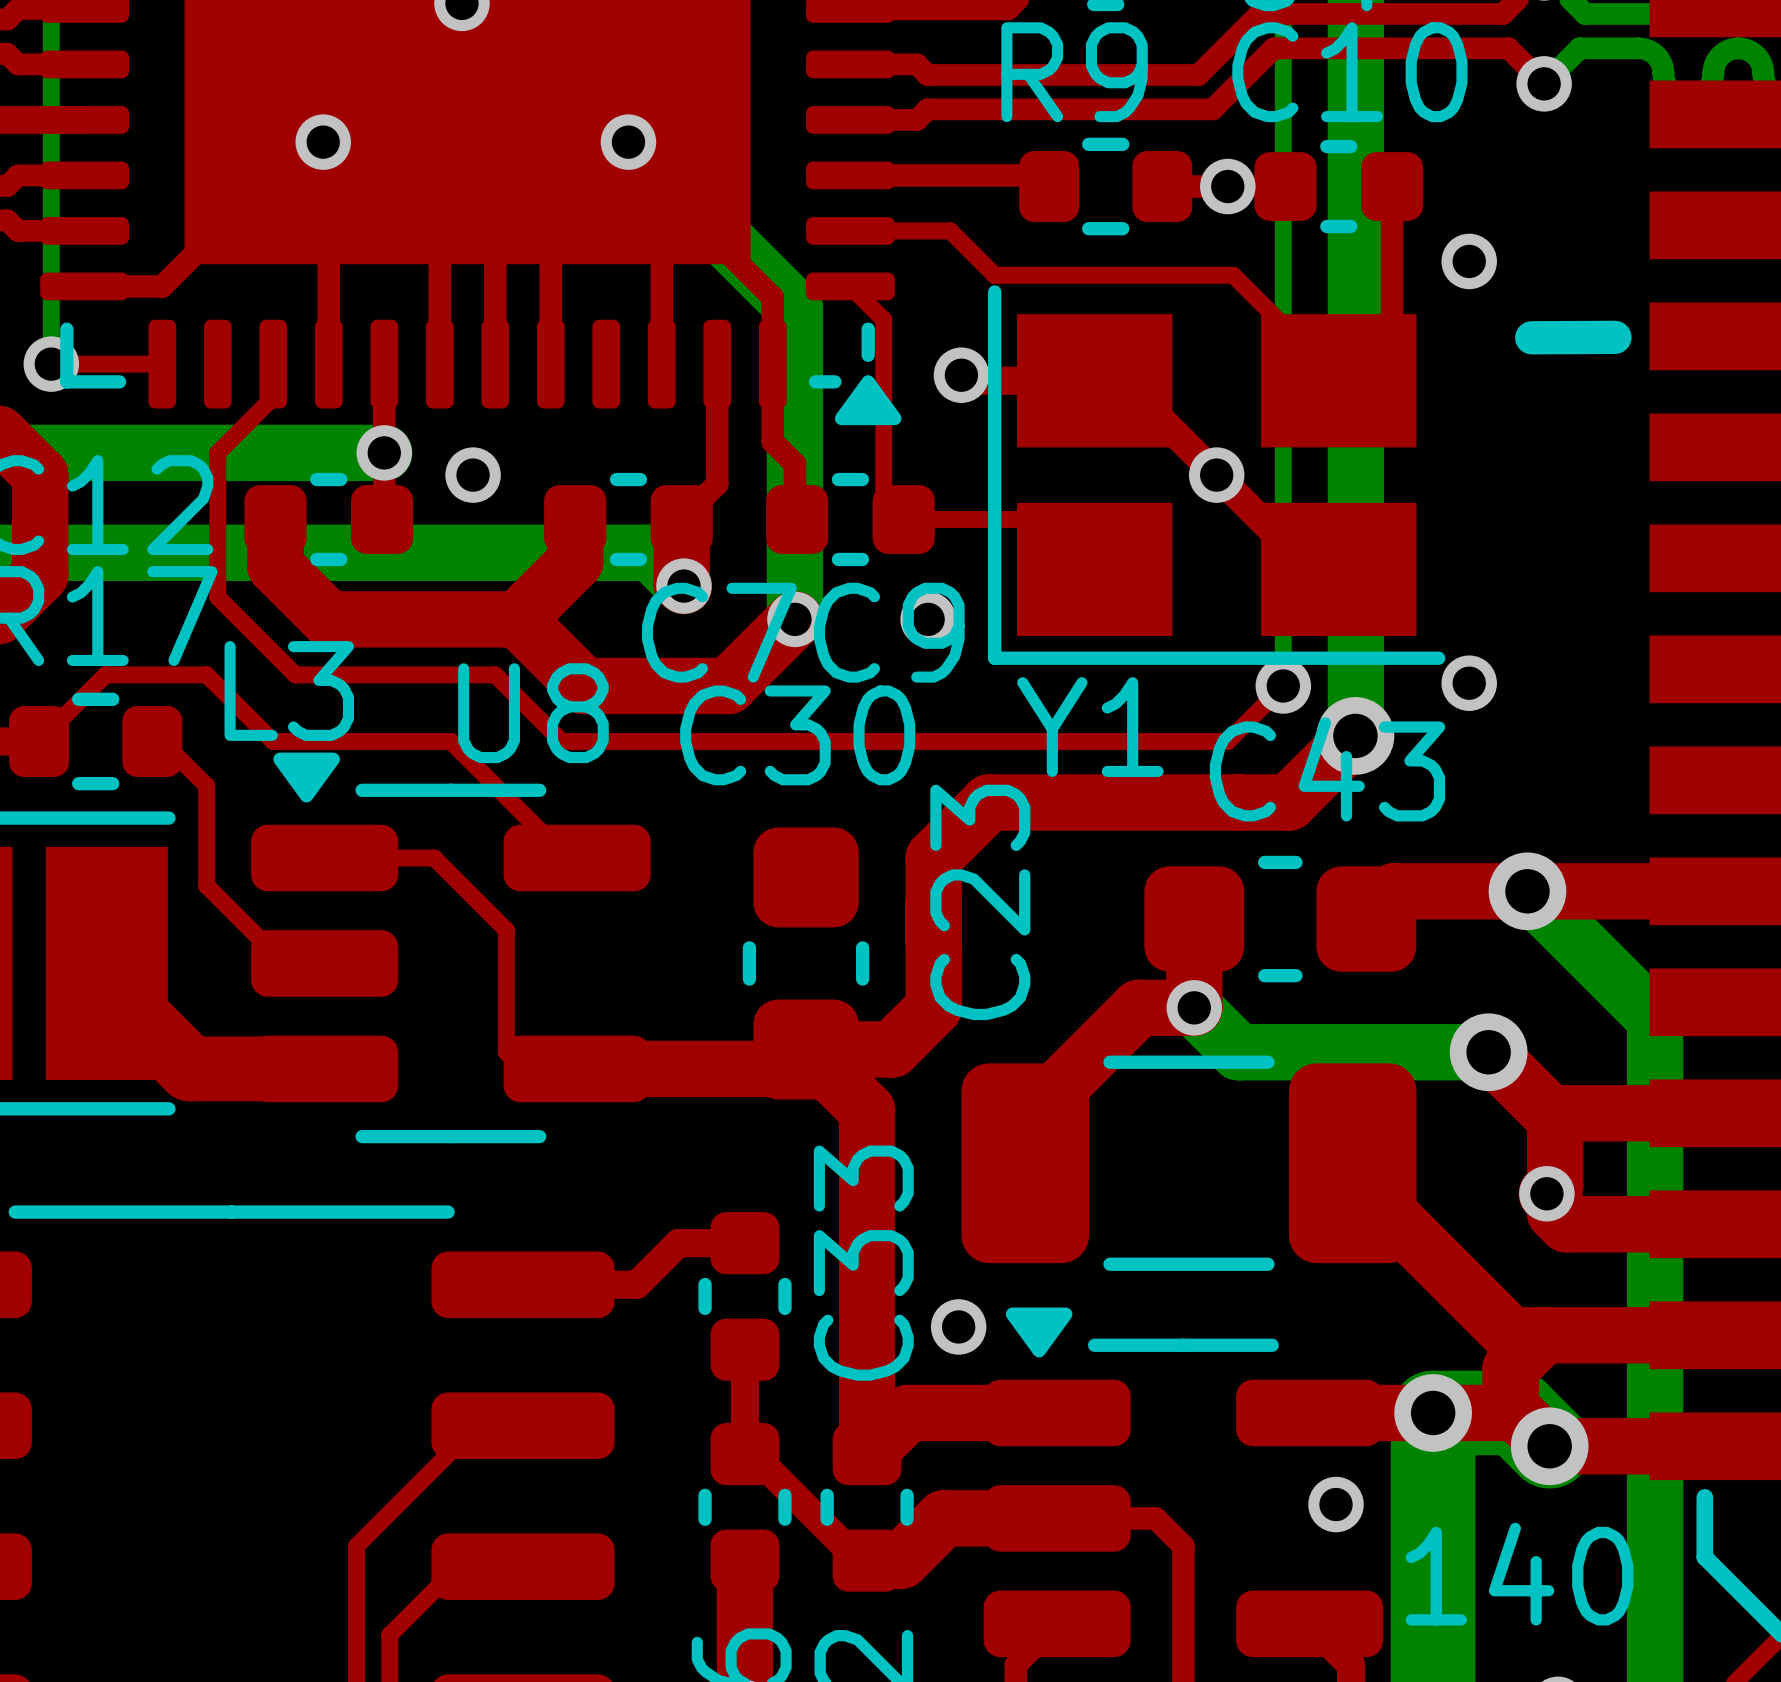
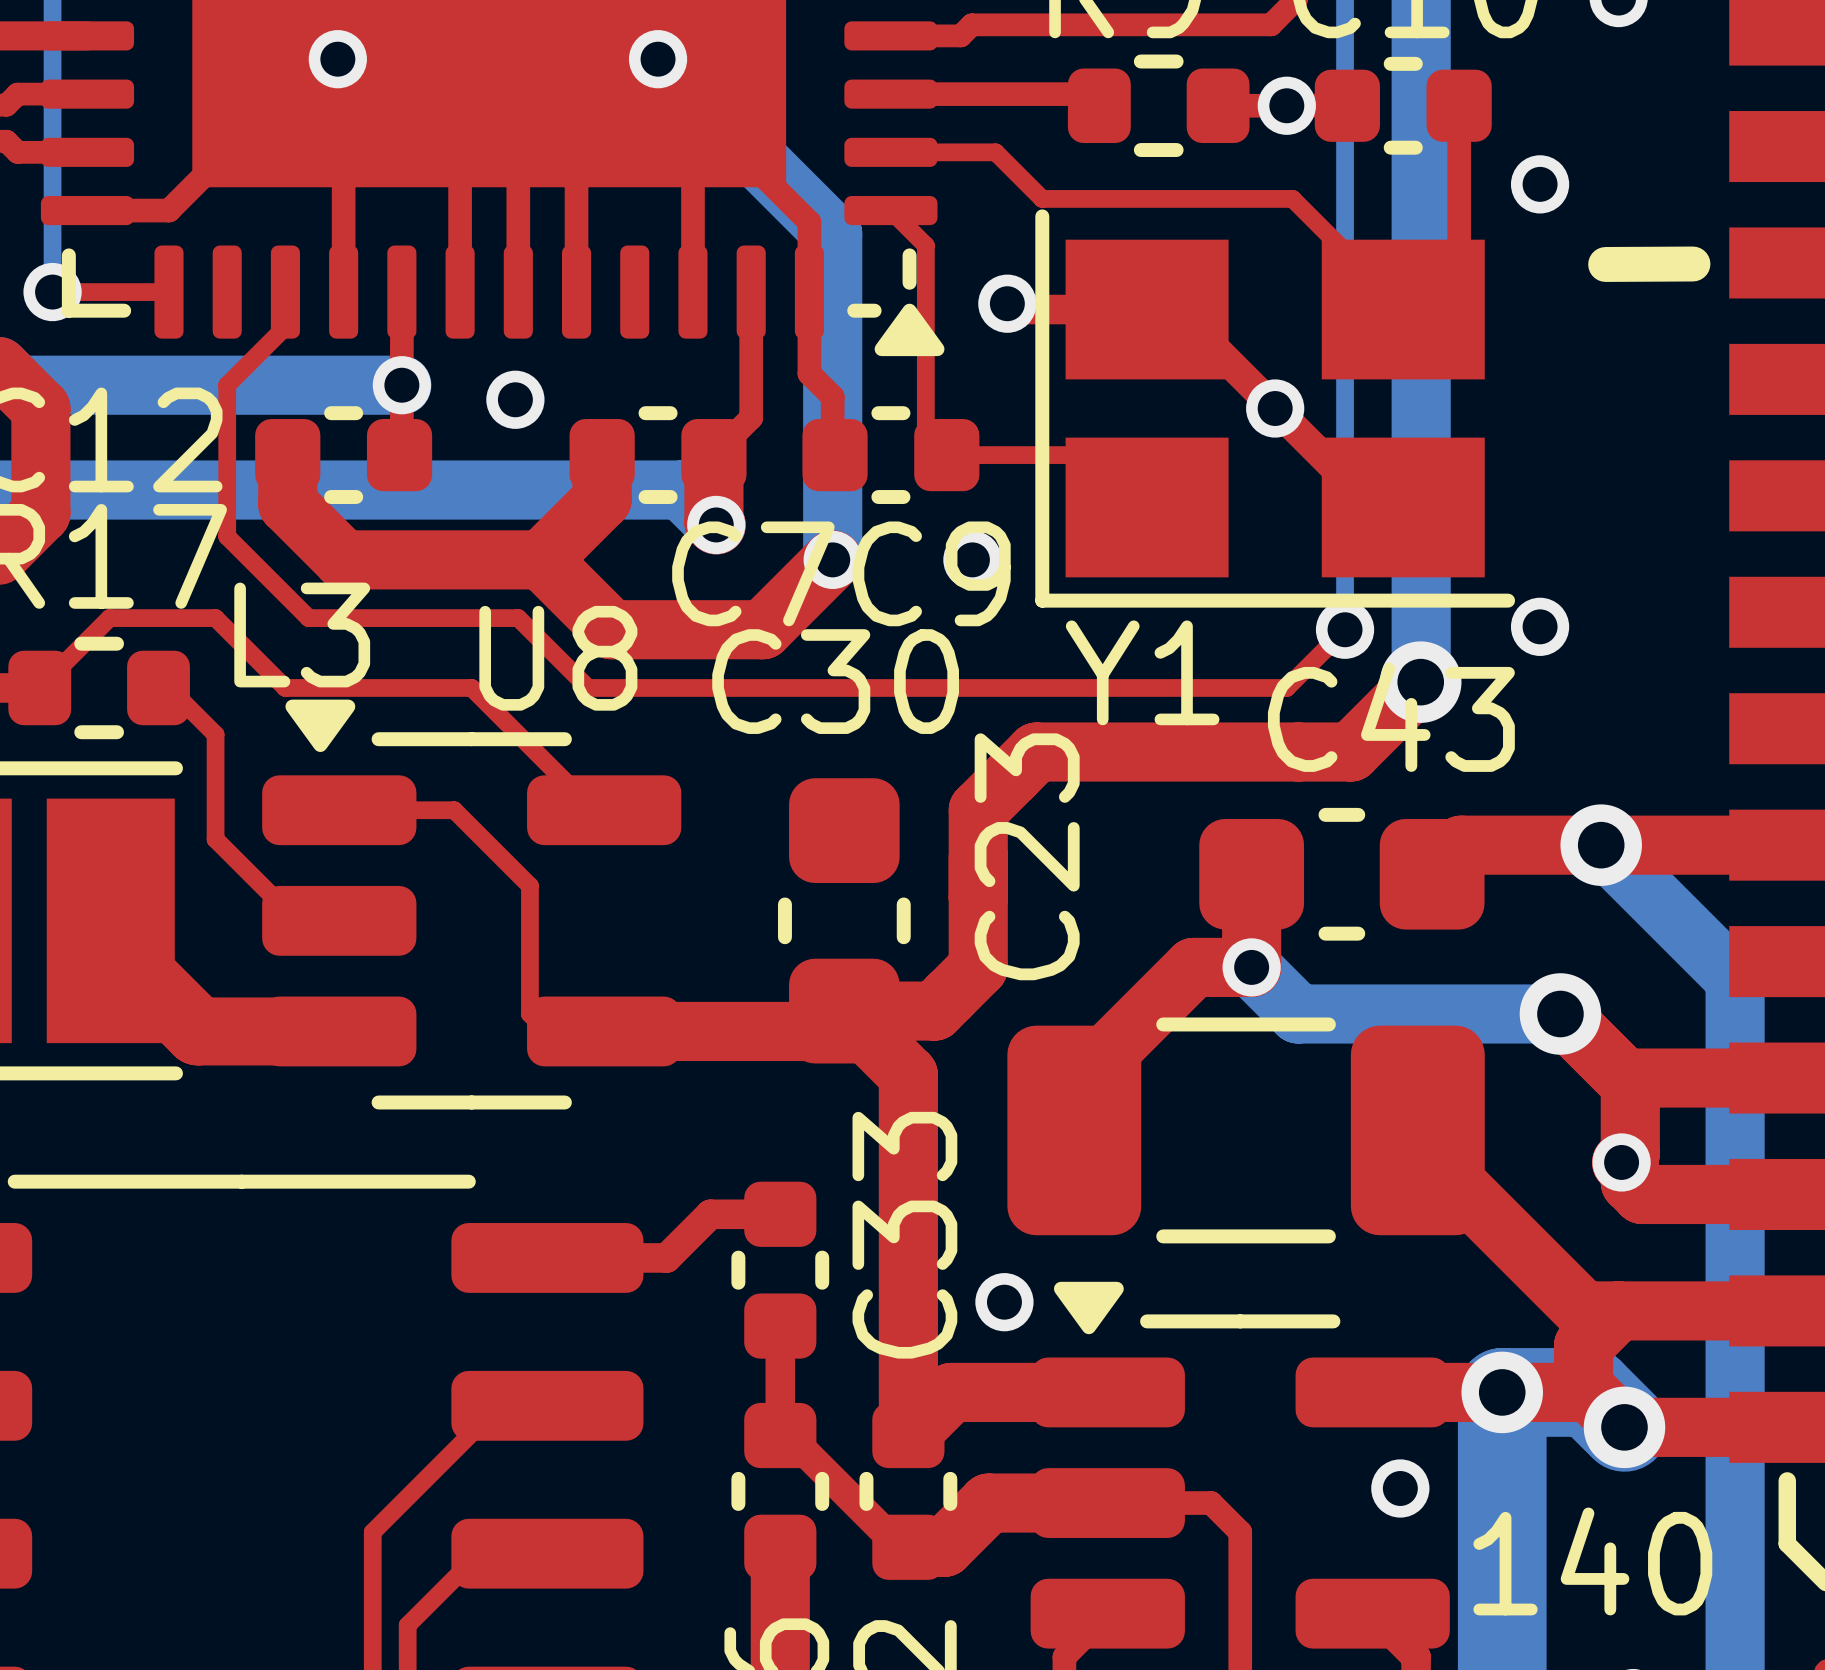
via position: (473, 475) -> (515, 399)

